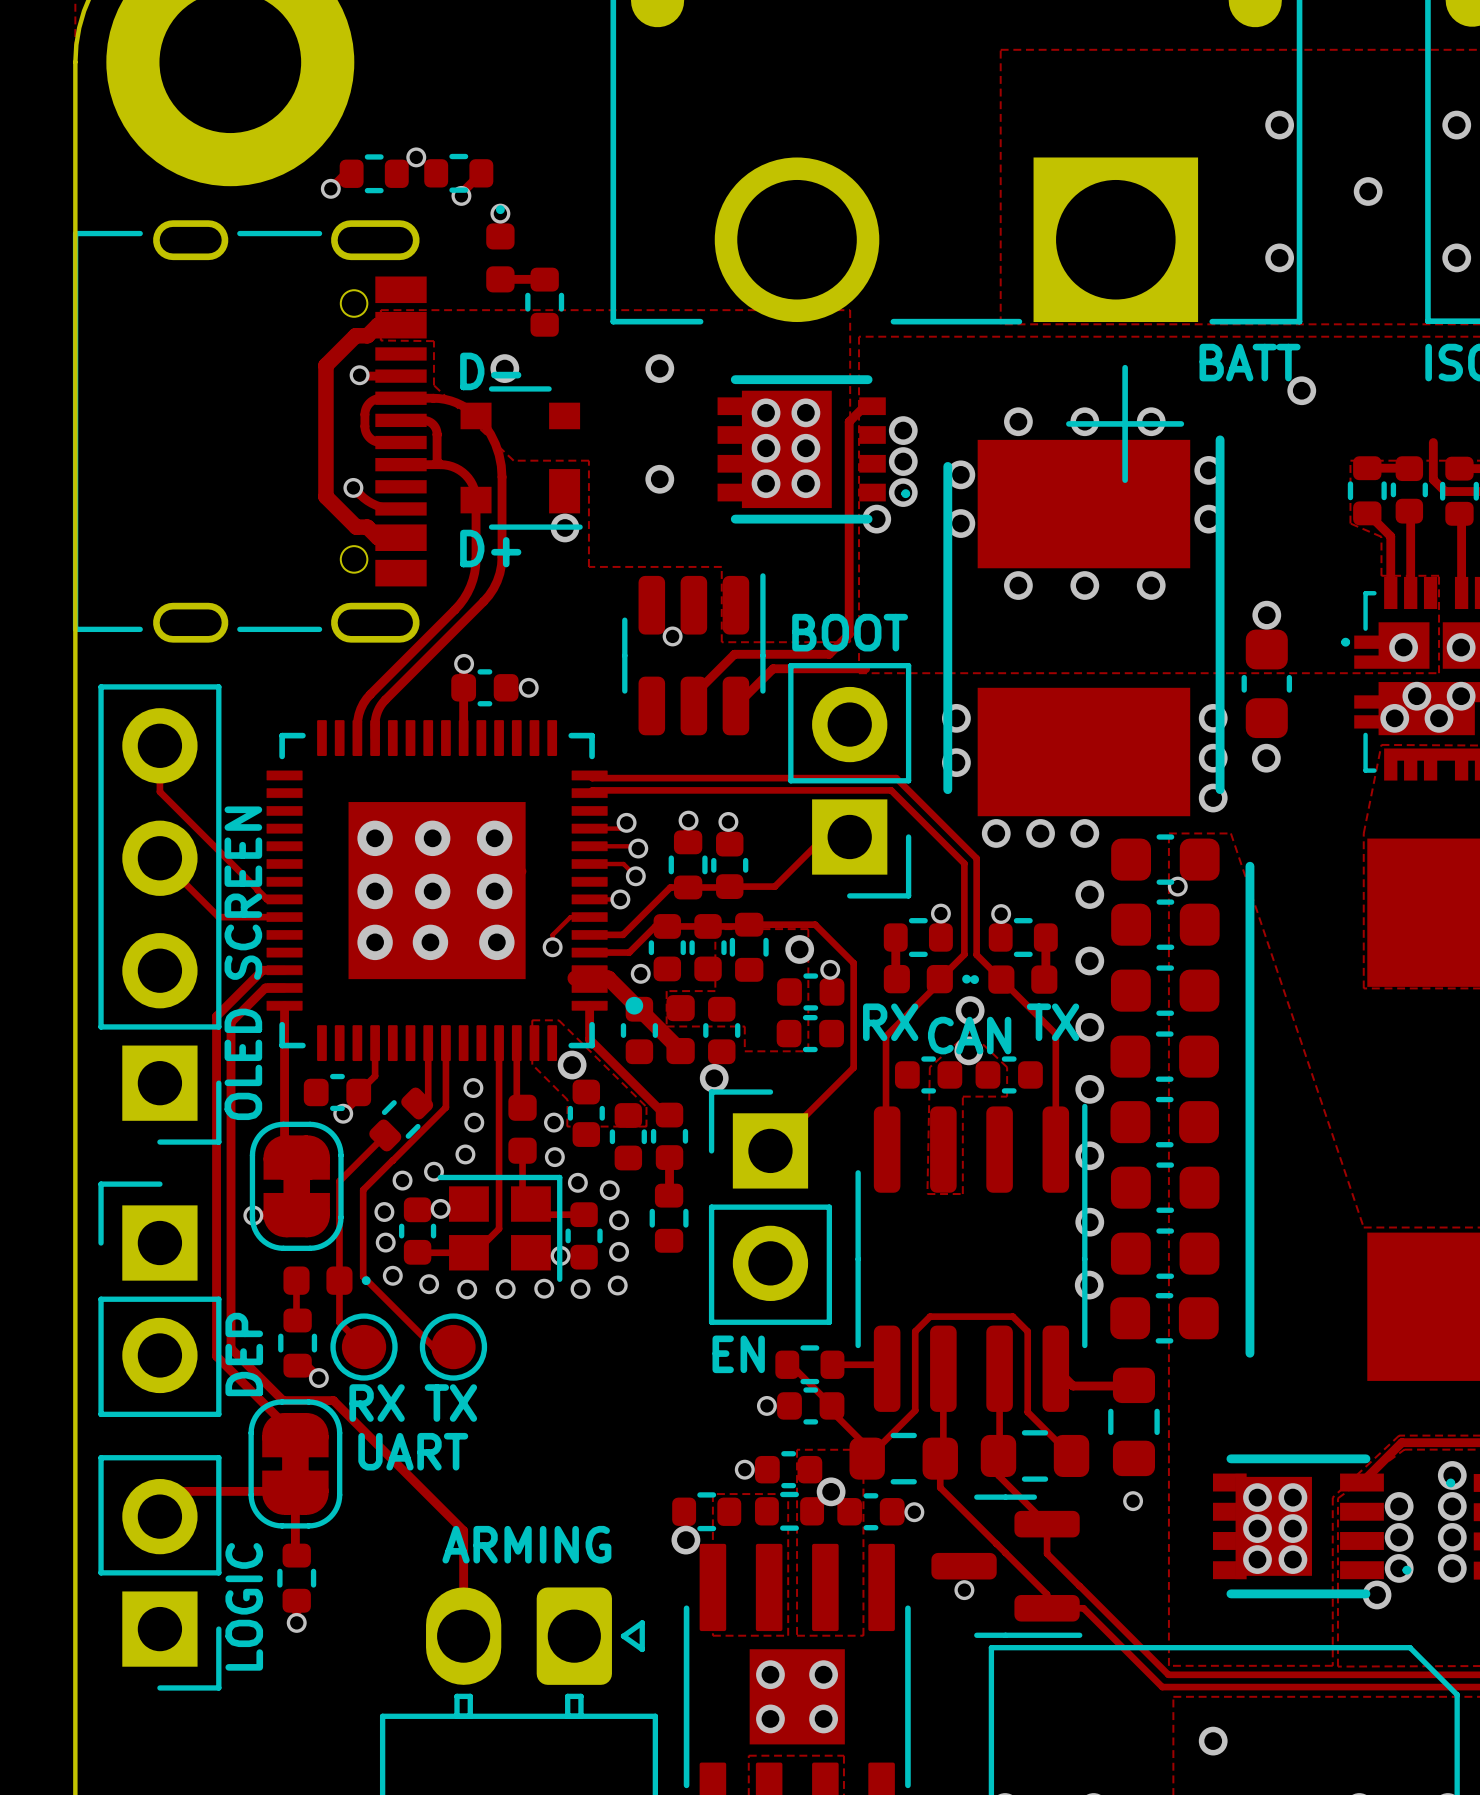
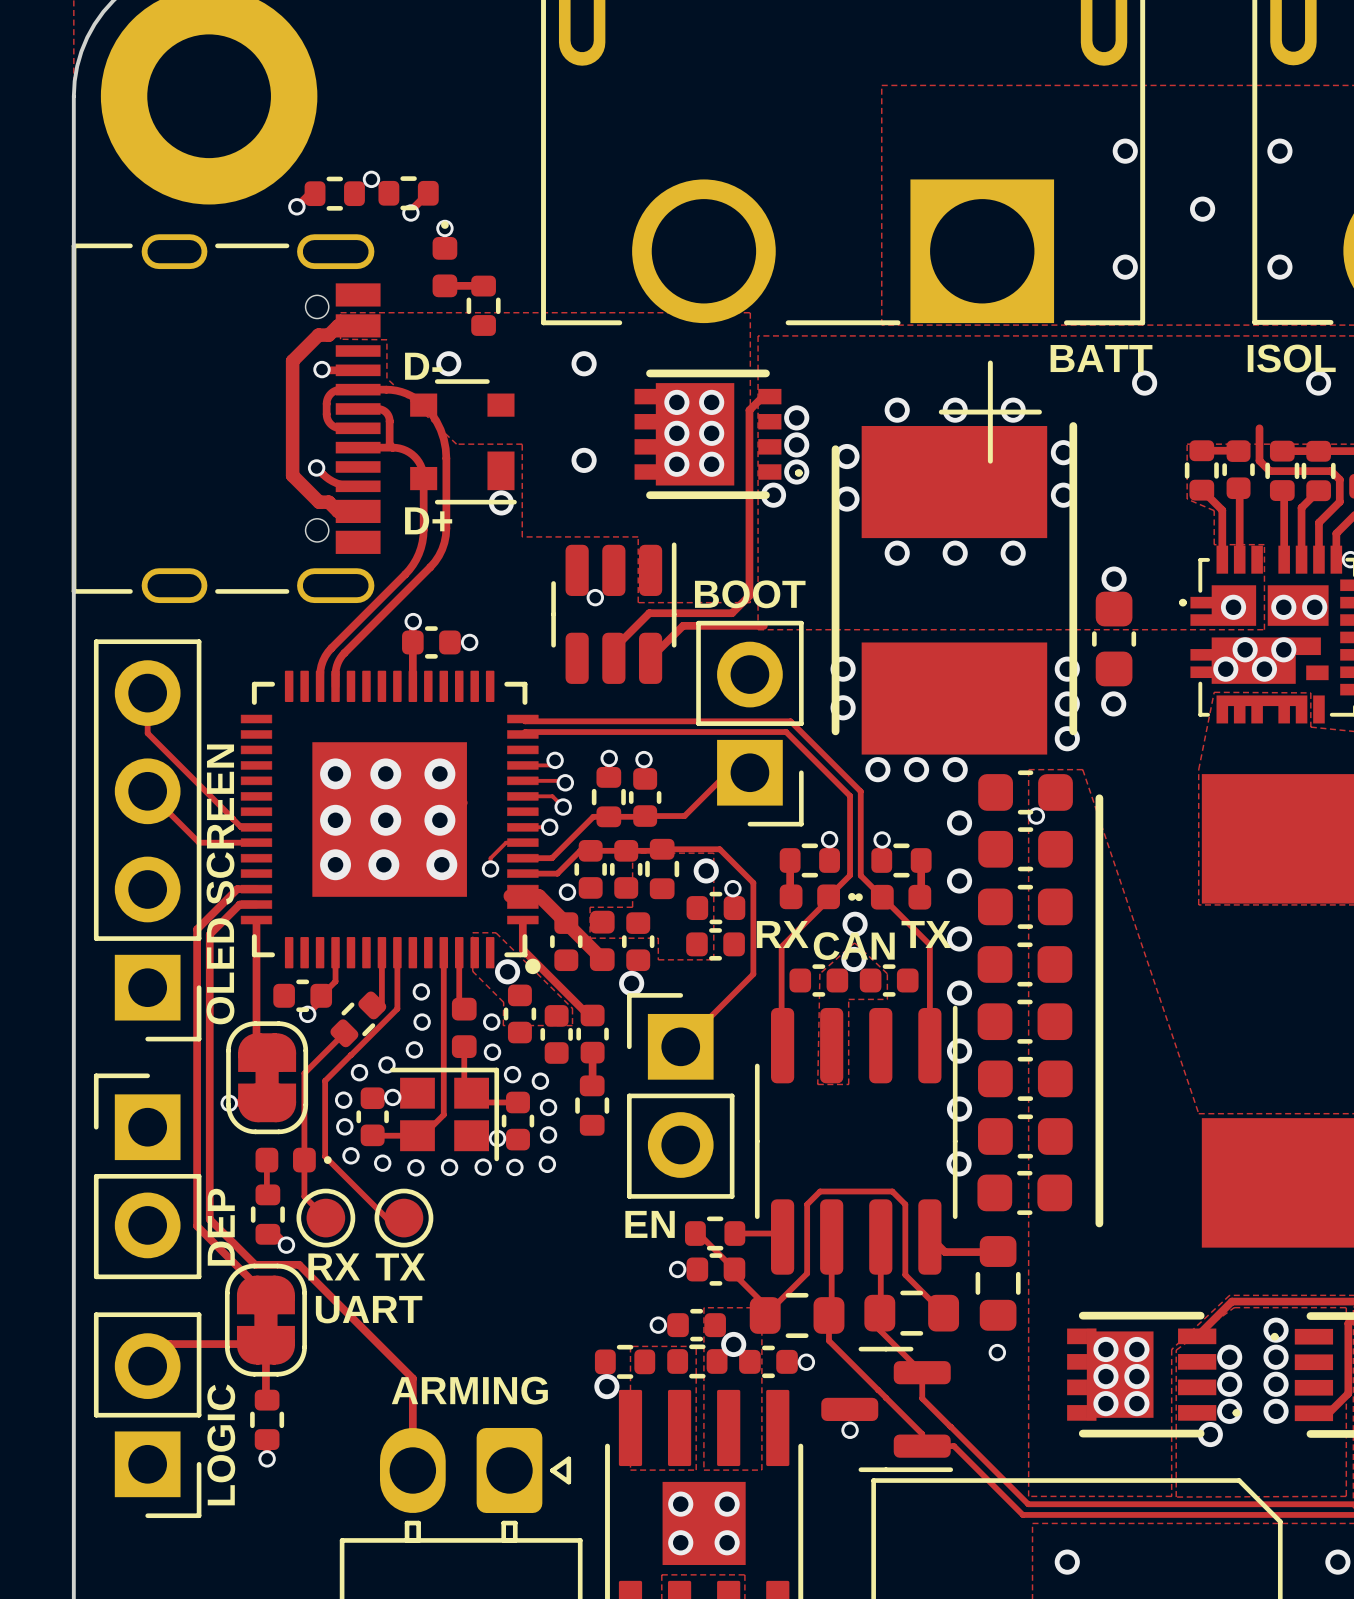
part footprint: [266, 720, 644, 1062] -> [240, 670, 541, 975]

